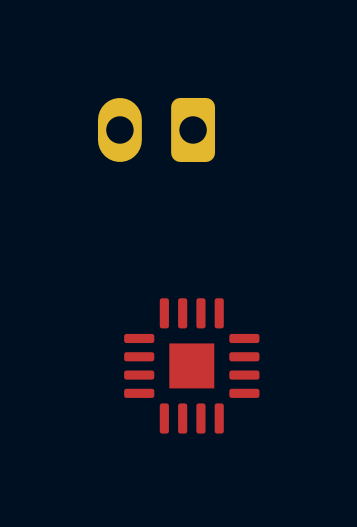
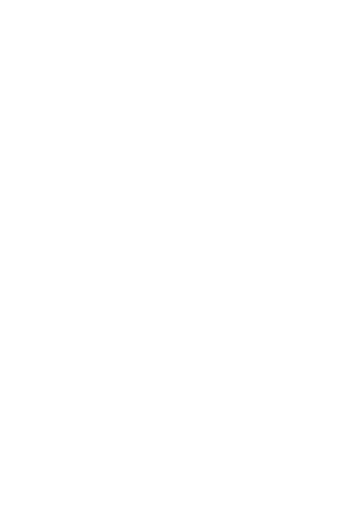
part: (156, 129) -> none
part: (191, 365) -> none

